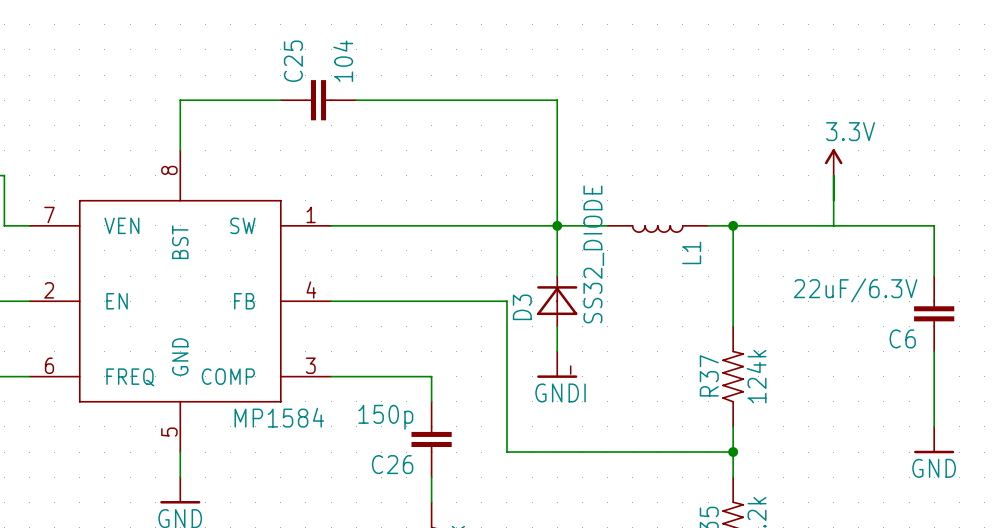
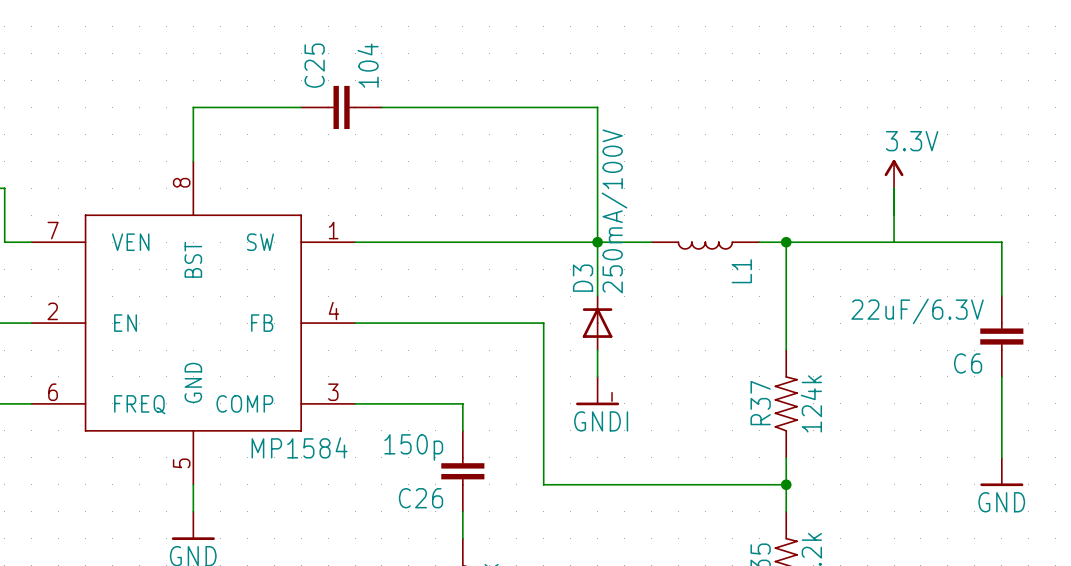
D3 value: SS32_DIODE (593, 254) -> 250mA/100V (614, 211)
D3 symbol: [537, 276, 578, 327] -> [582, 296, 613, 351]
D3 name position: D3 (522, 307) -> D3 (583, 278)

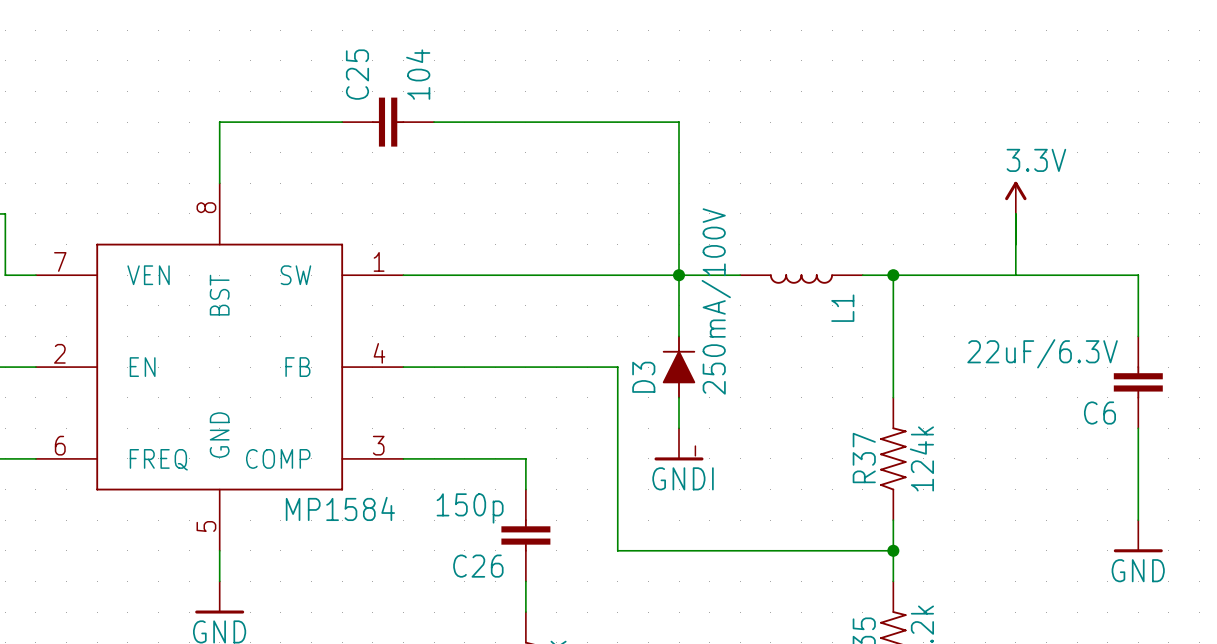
D3 value position: 250mA/100V (614, 211) -> 250mA/100V (716, 301)
D3 name position: D3 (583, 278) -> D3 (643, 377)
D3 symbol: [582, 296, 613, 351] -> [662, 335, 696, 399]

